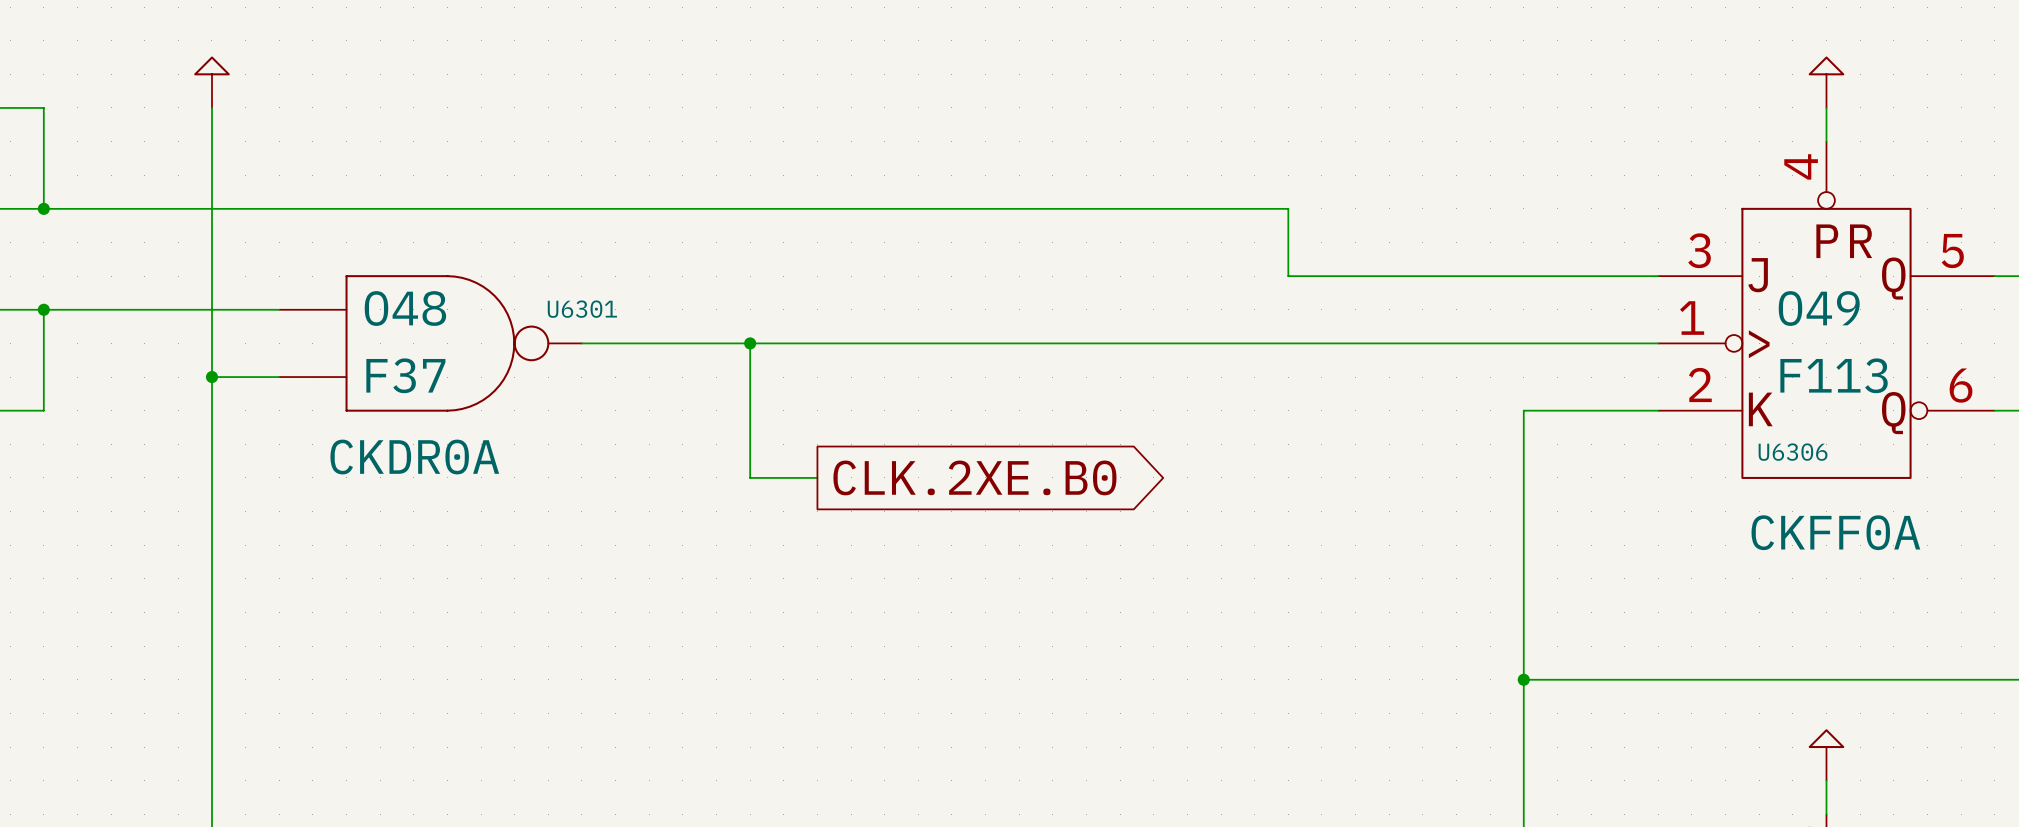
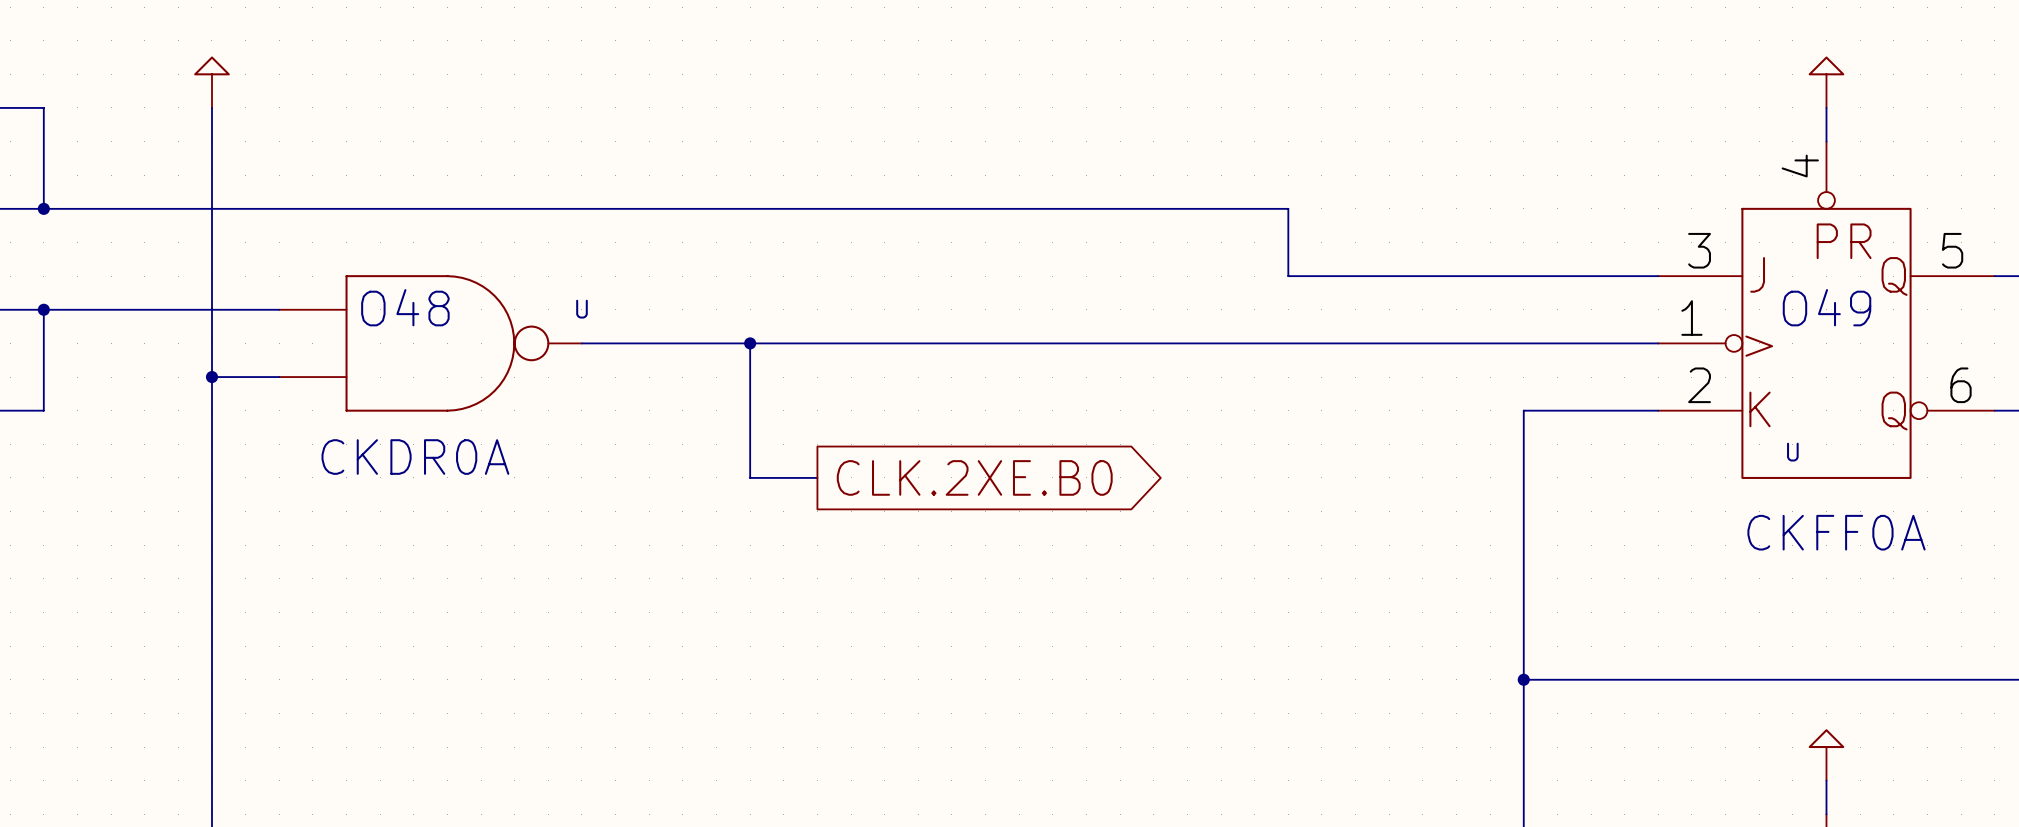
U6301 name: U6301 (582, 309) -> U (581, 309)
U6301 value: F37 (405, 375) -> none
U6306 value: F113 (1834, 375) -> none
U6306 name: U6306 (1793, 452) -> U (1792, 452)

